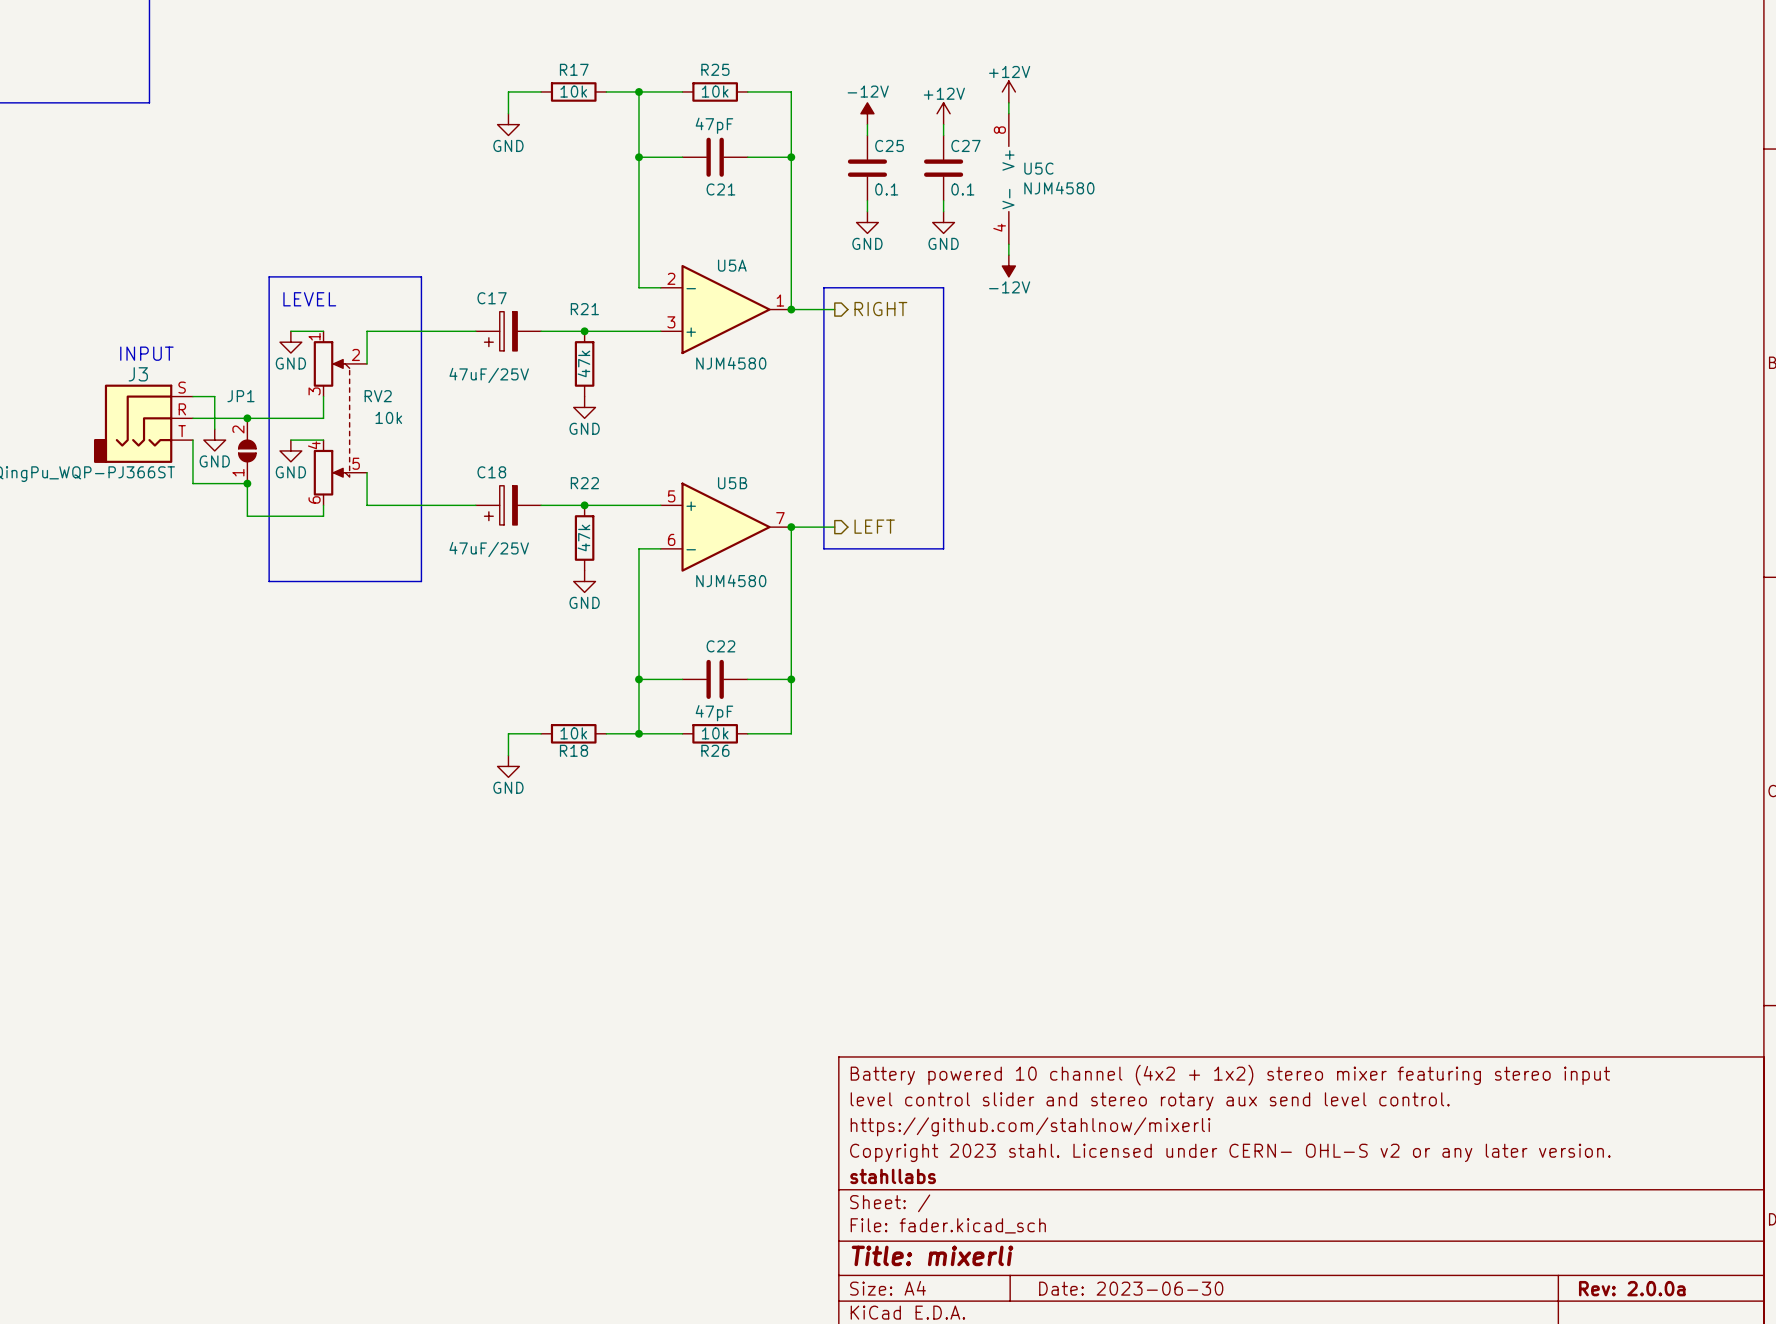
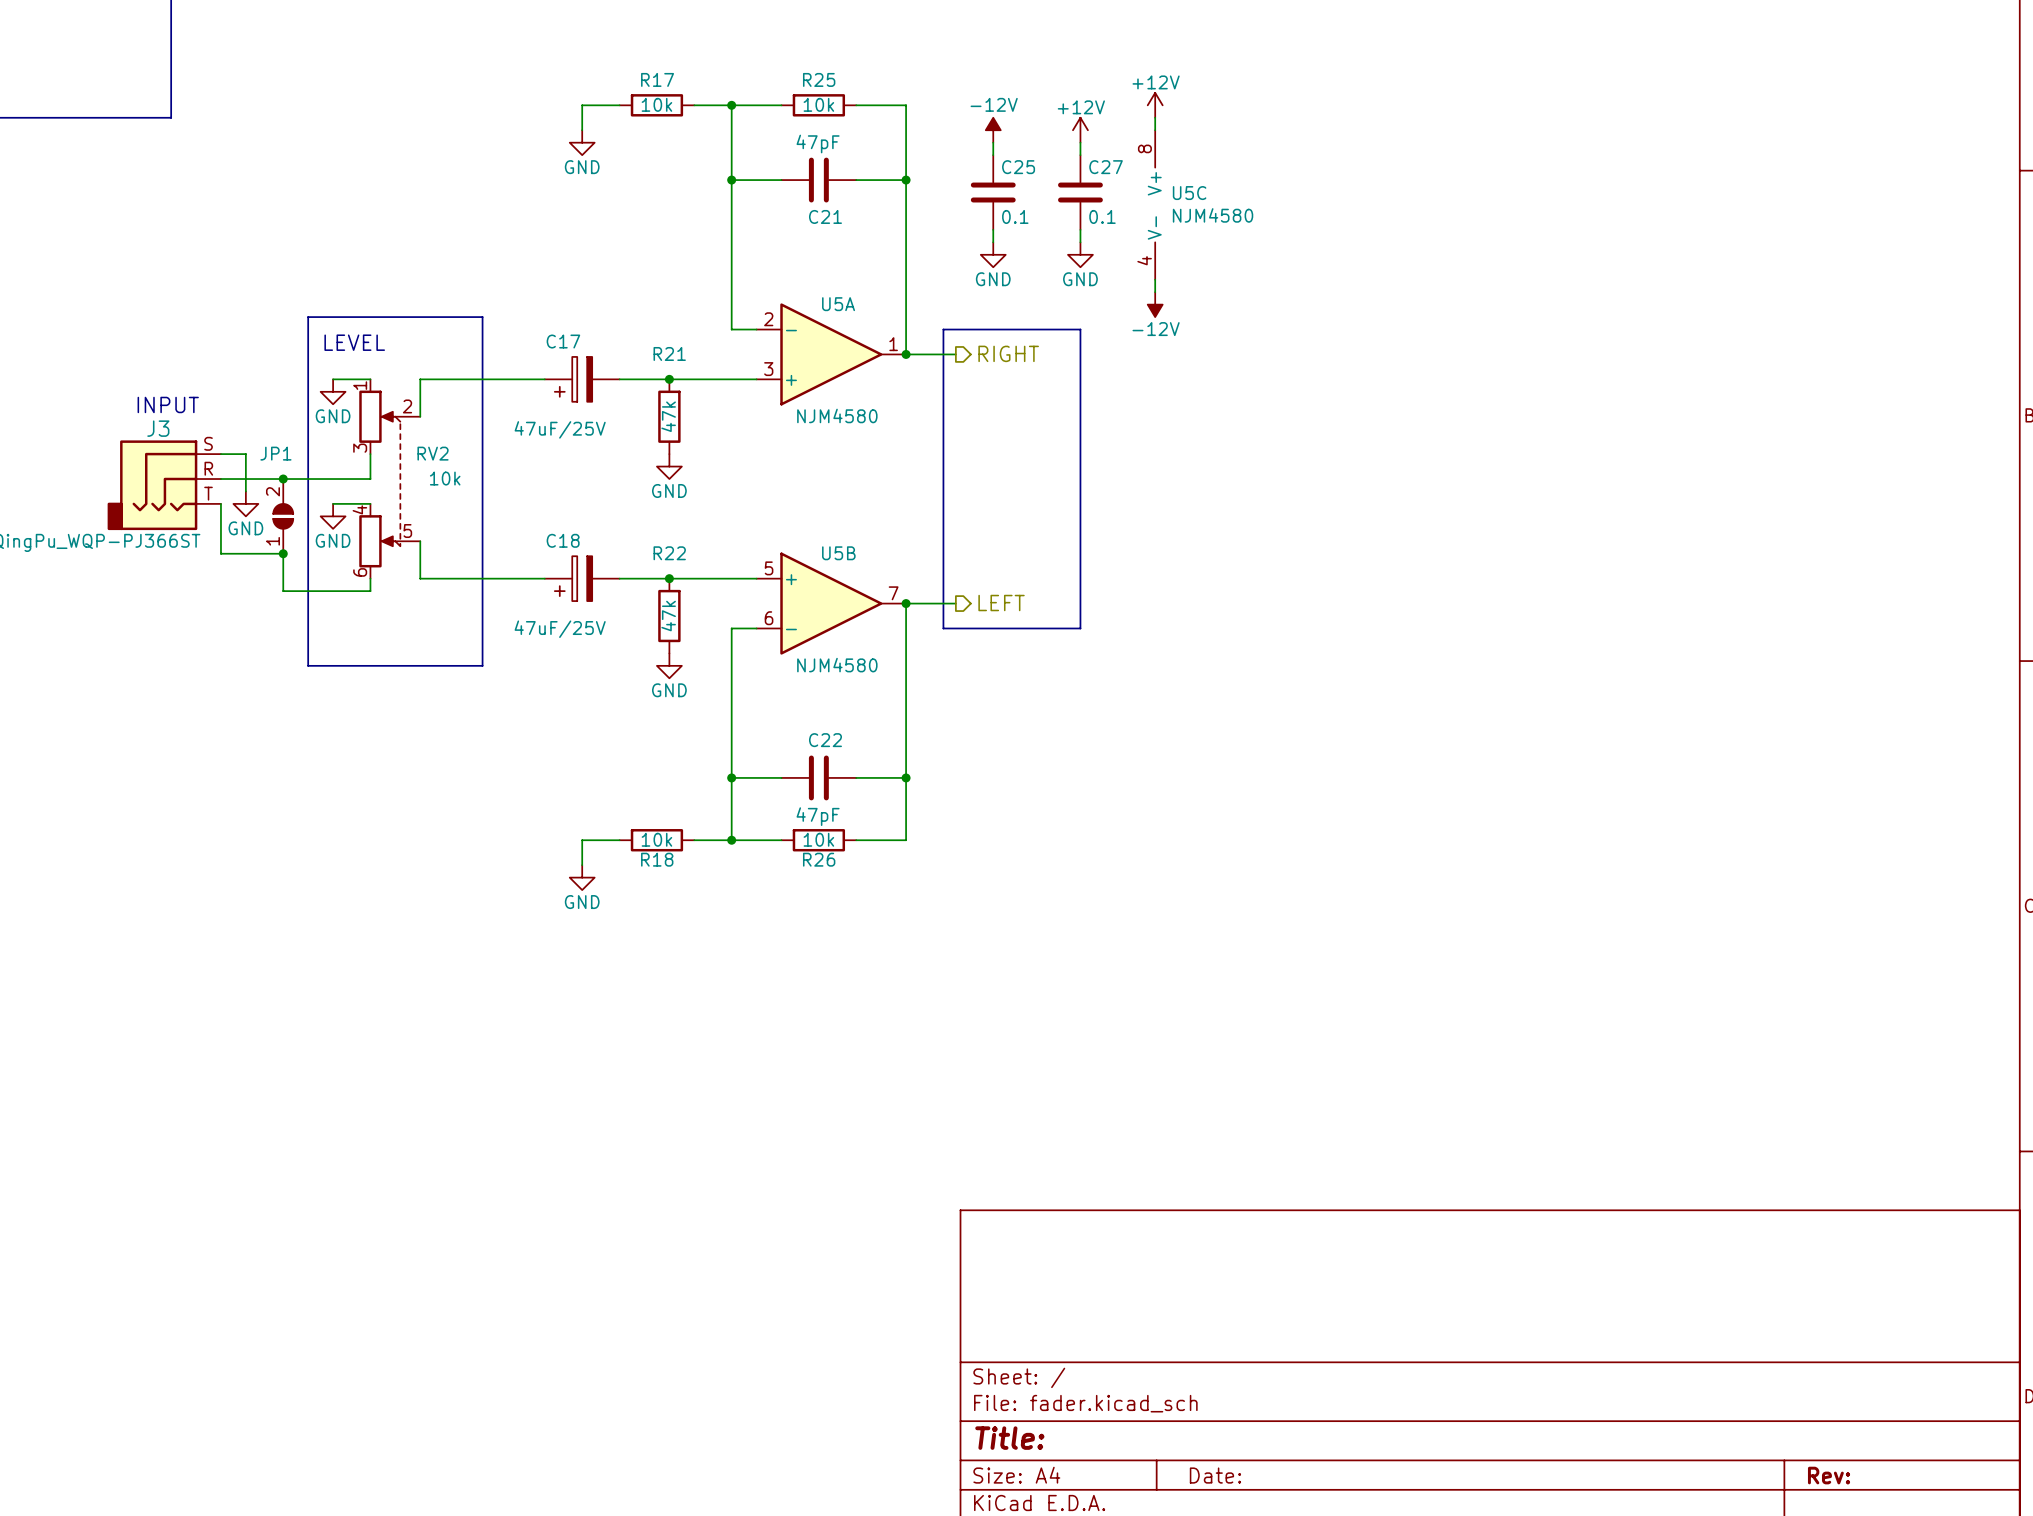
title block: Battery powered 10 channel (4x2 + 1x2) stereo mixer featuring stereo input (1230, 1075) -> none
title block: level control slider and stereo rotary aux send level control. (1150, 1101) -> none
title block: https://github.com/stahlnow/mixerli (1030, 1126) -> none
title block: Copyright 2023 stahl. Licensed under CERN- OHL-S v2 or any later version. (1230, 1152) -> none
title block: stahllabs (893, 1176) -> none
title block: Title: mixerli (932, 1255) -> Title: (1009, 1438)
title block: Date: 2023-06-30 (1131, 1288) -> Date: (1215, 1475)
title block: Rev: 2.0.0a (1632, 1288) -> Rev: (1829, 1475)

